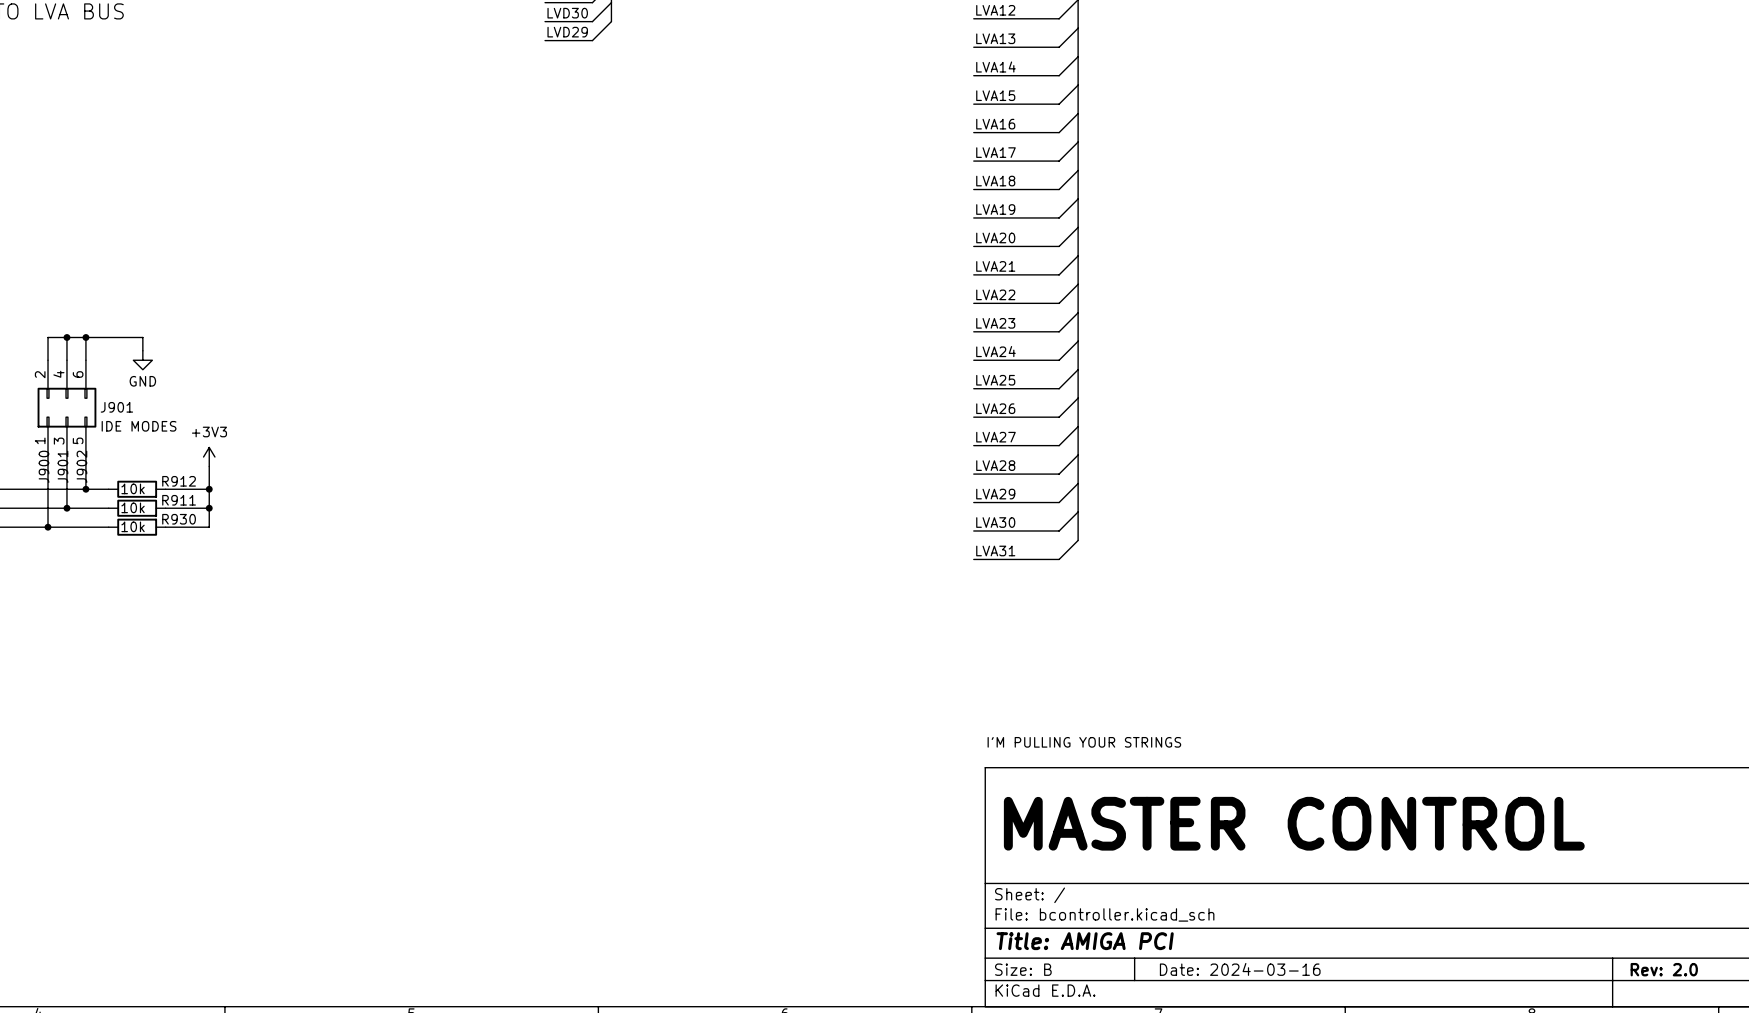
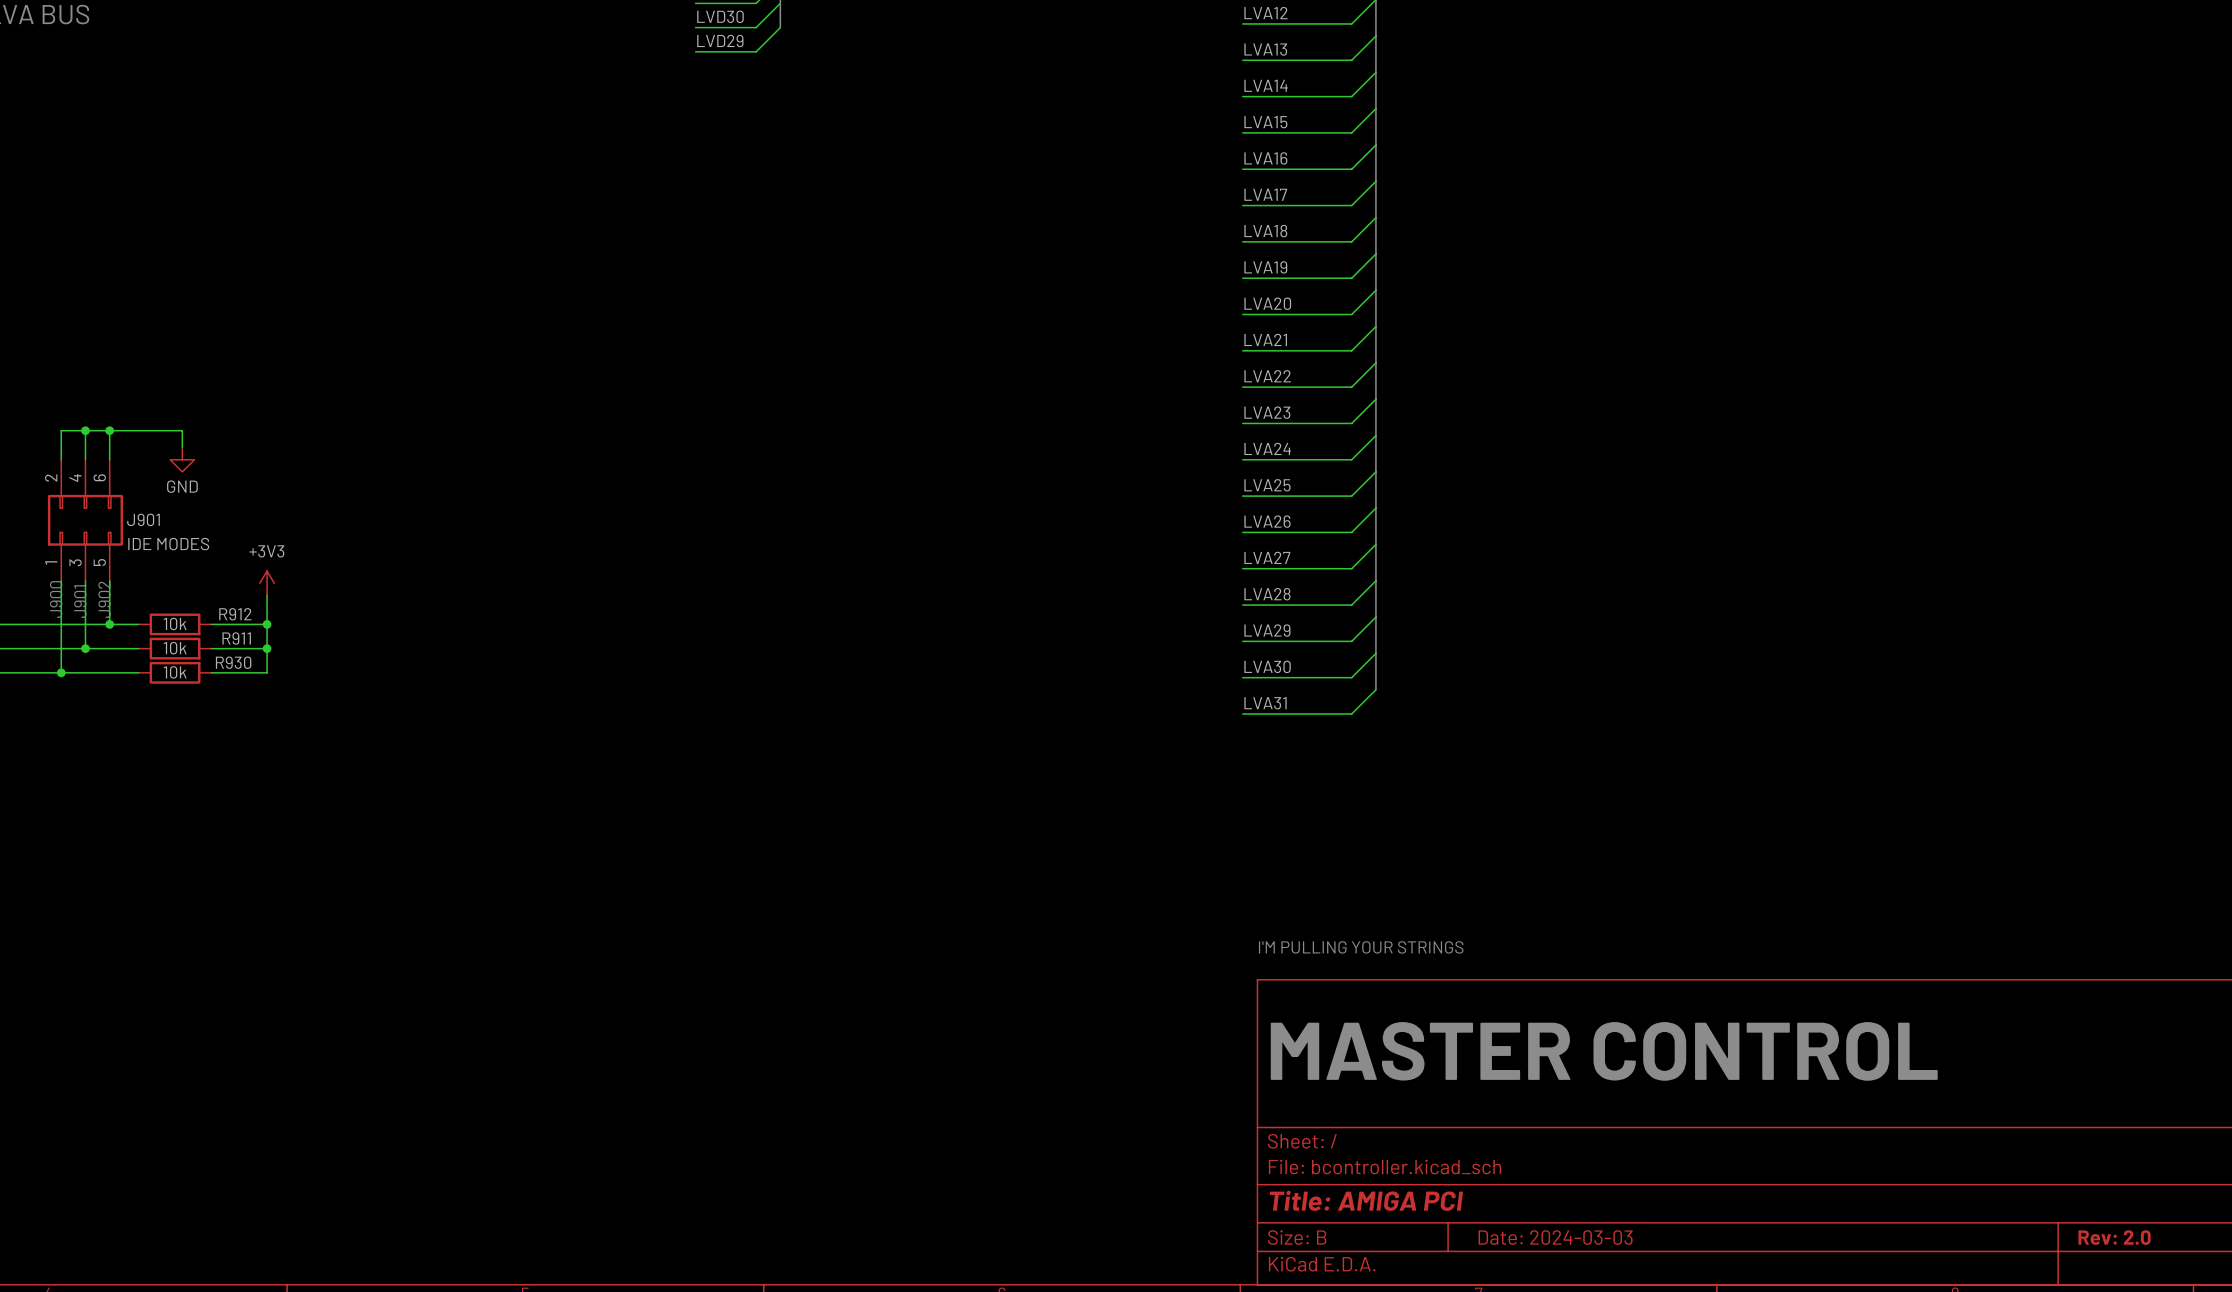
title block: Date: 2024-03-16 (1240, 969) -> Date: 2024-03-03 (1555, 1237)

